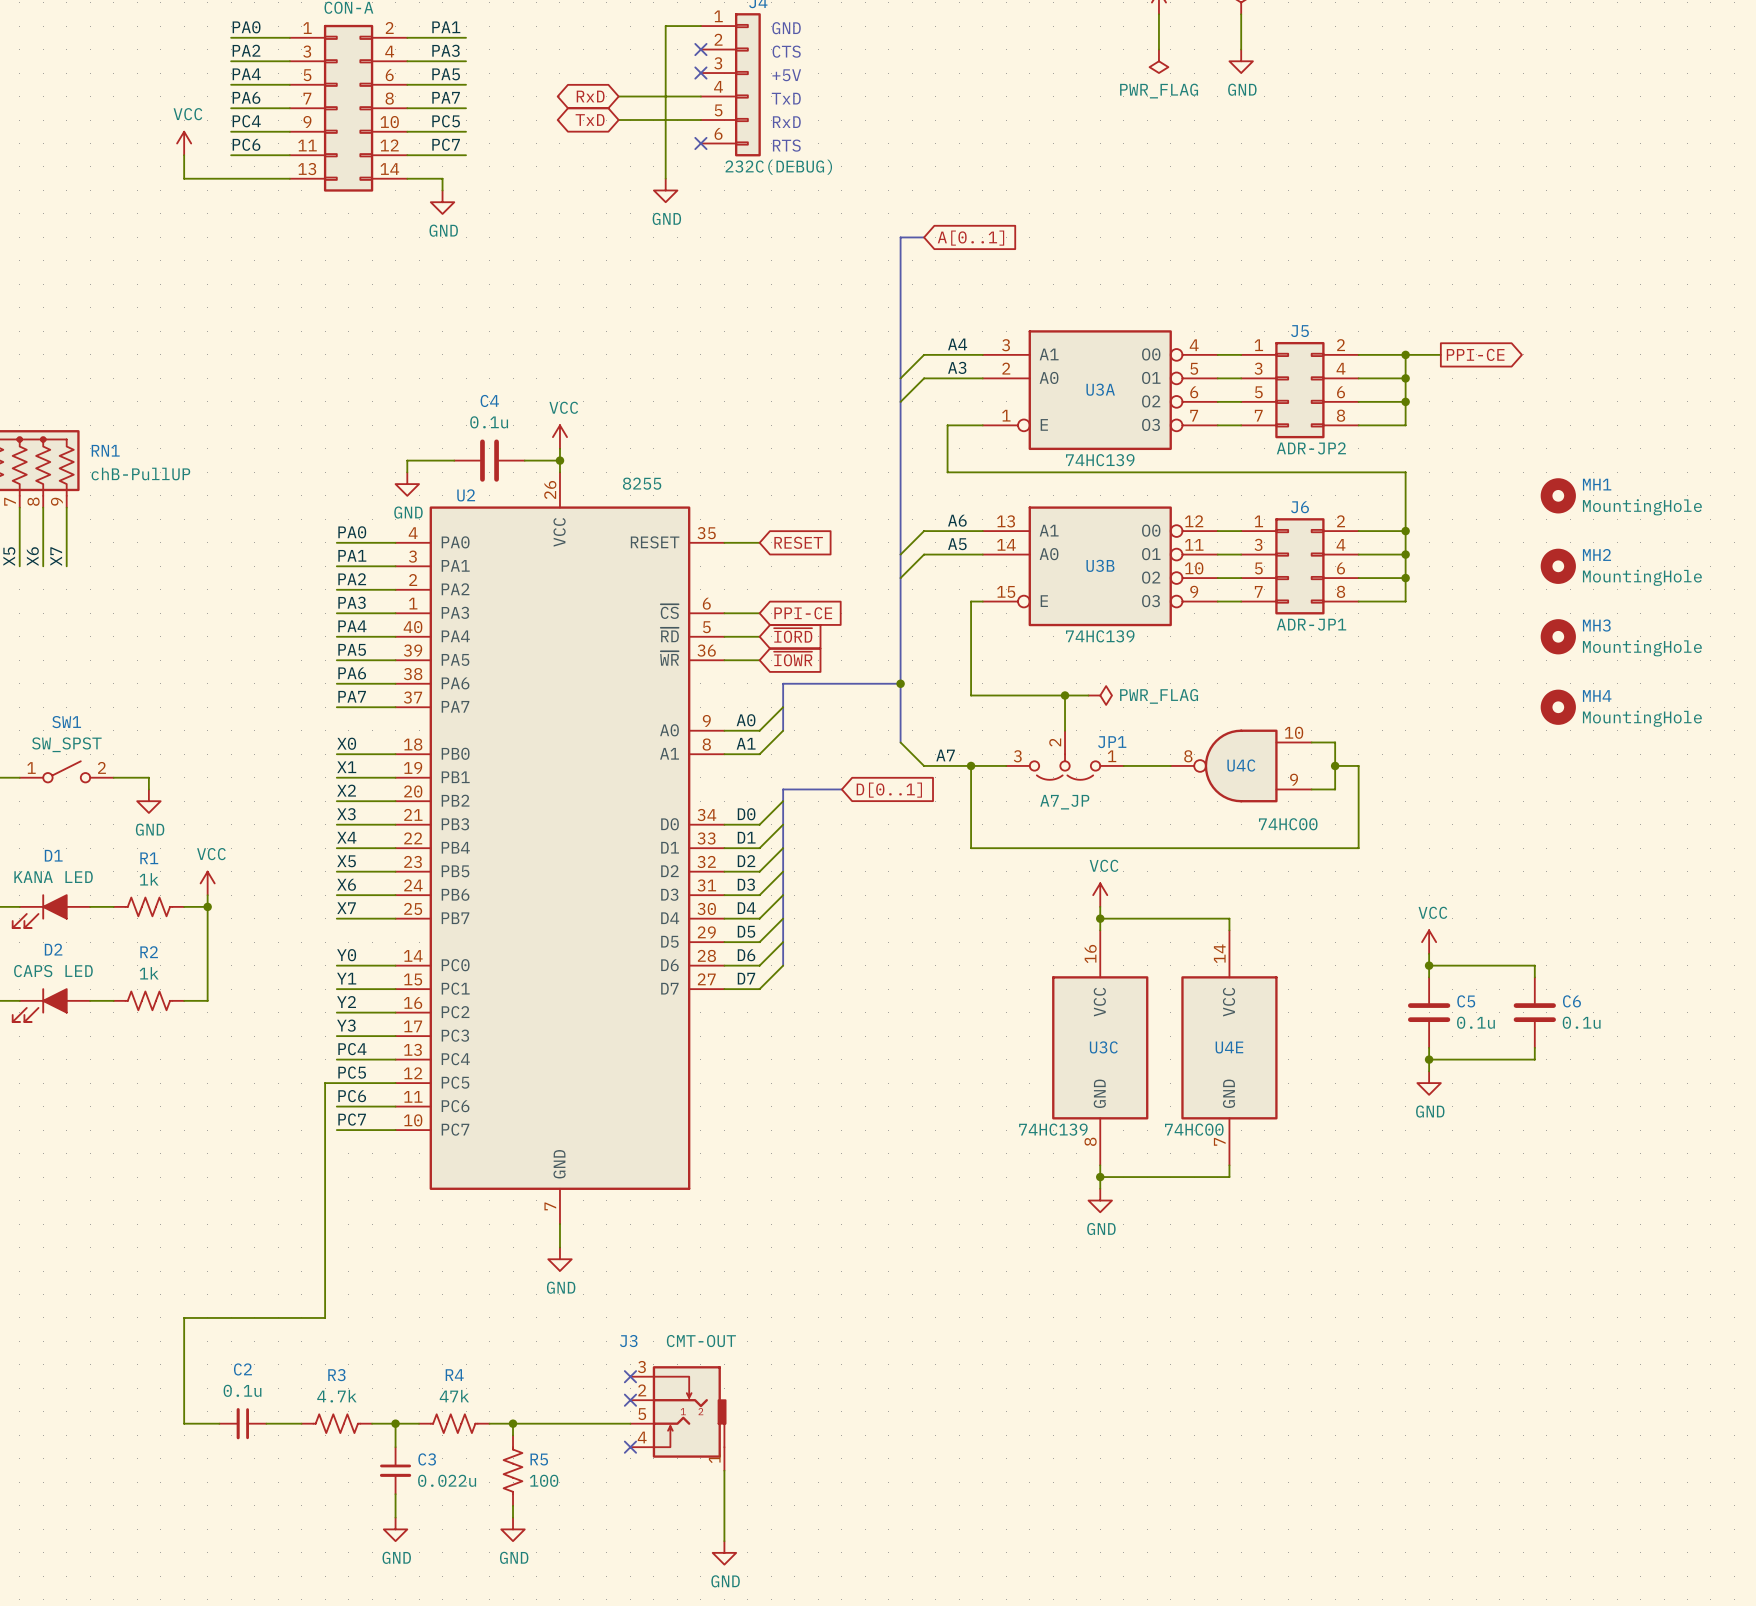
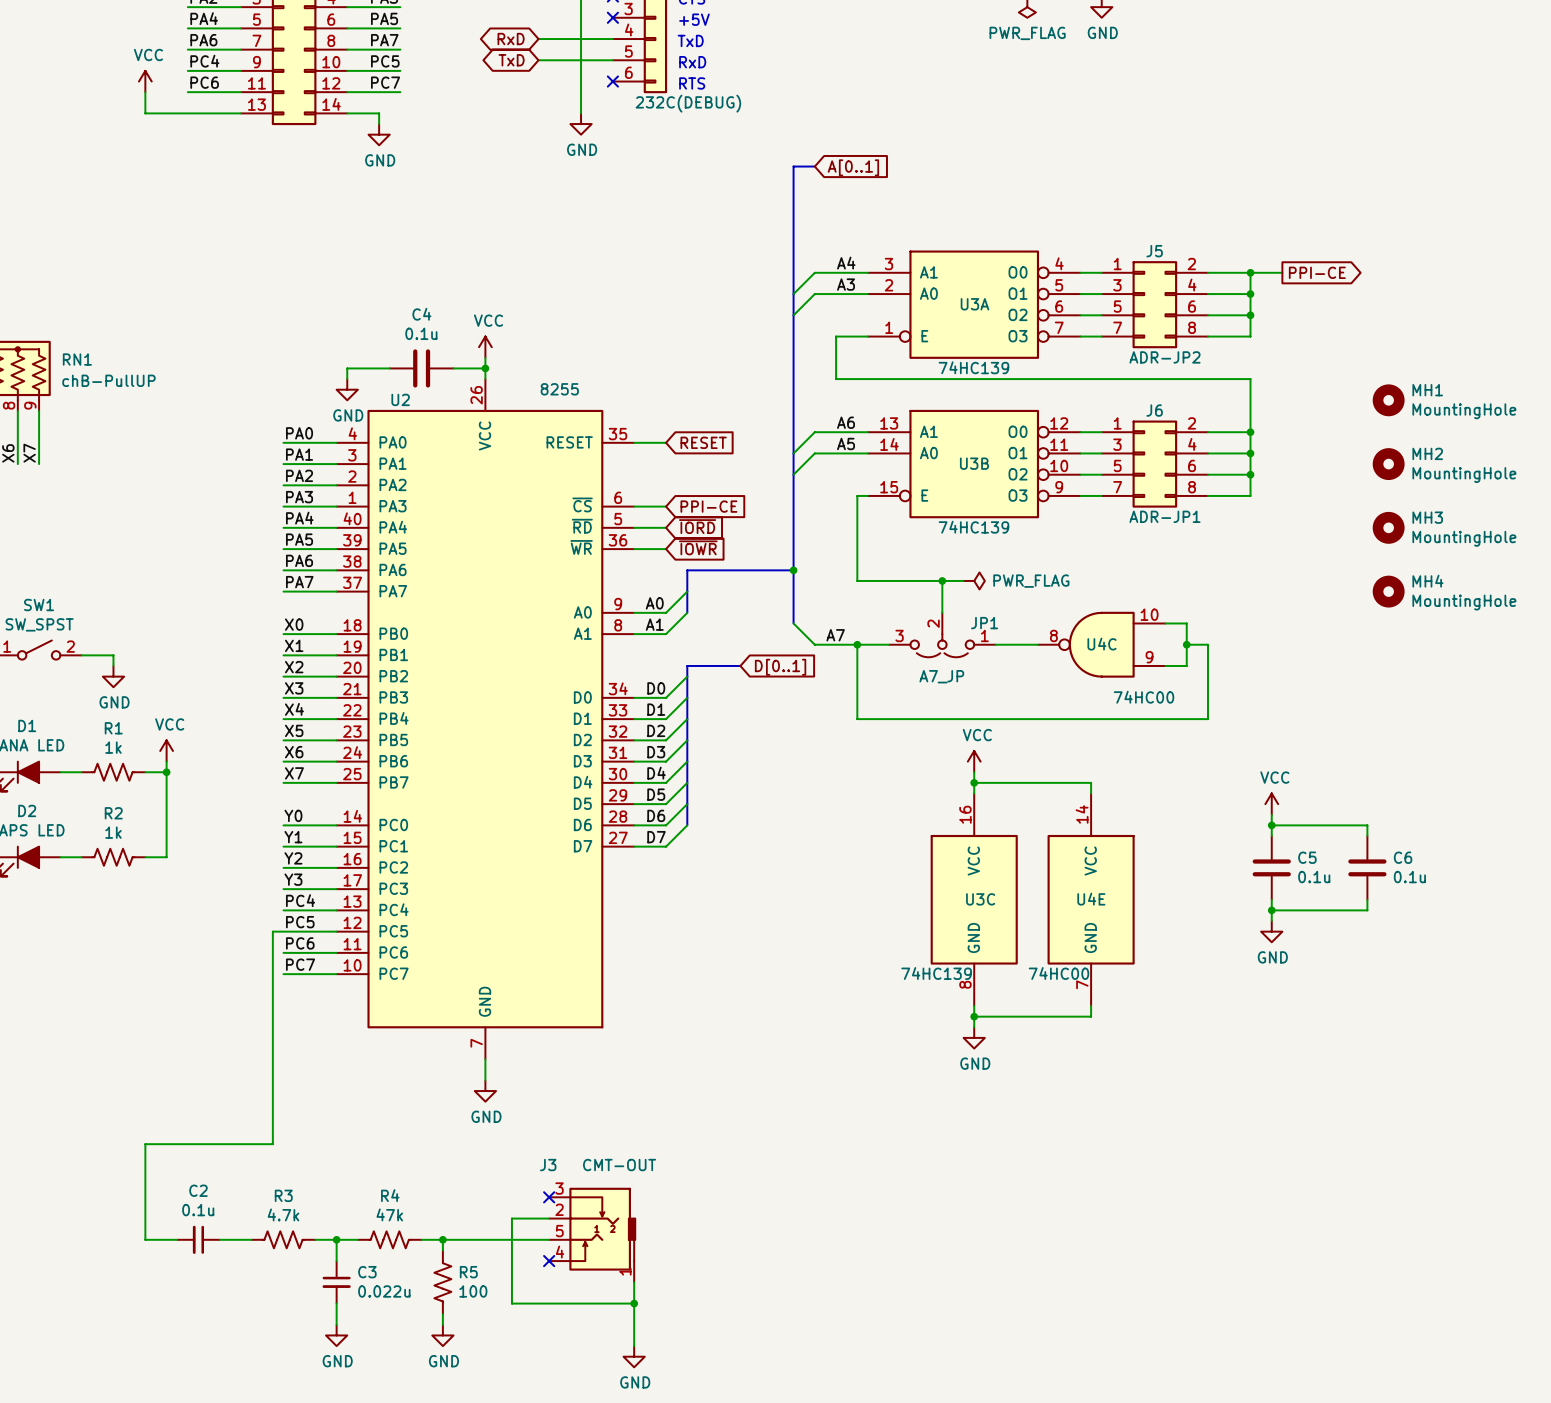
wire: none -> (549, 1218) (511, 1218) (511, 1303) (634, 1303)
no-connect mark: (630, 1400) -> none
junction: none -> (634, 1303)

